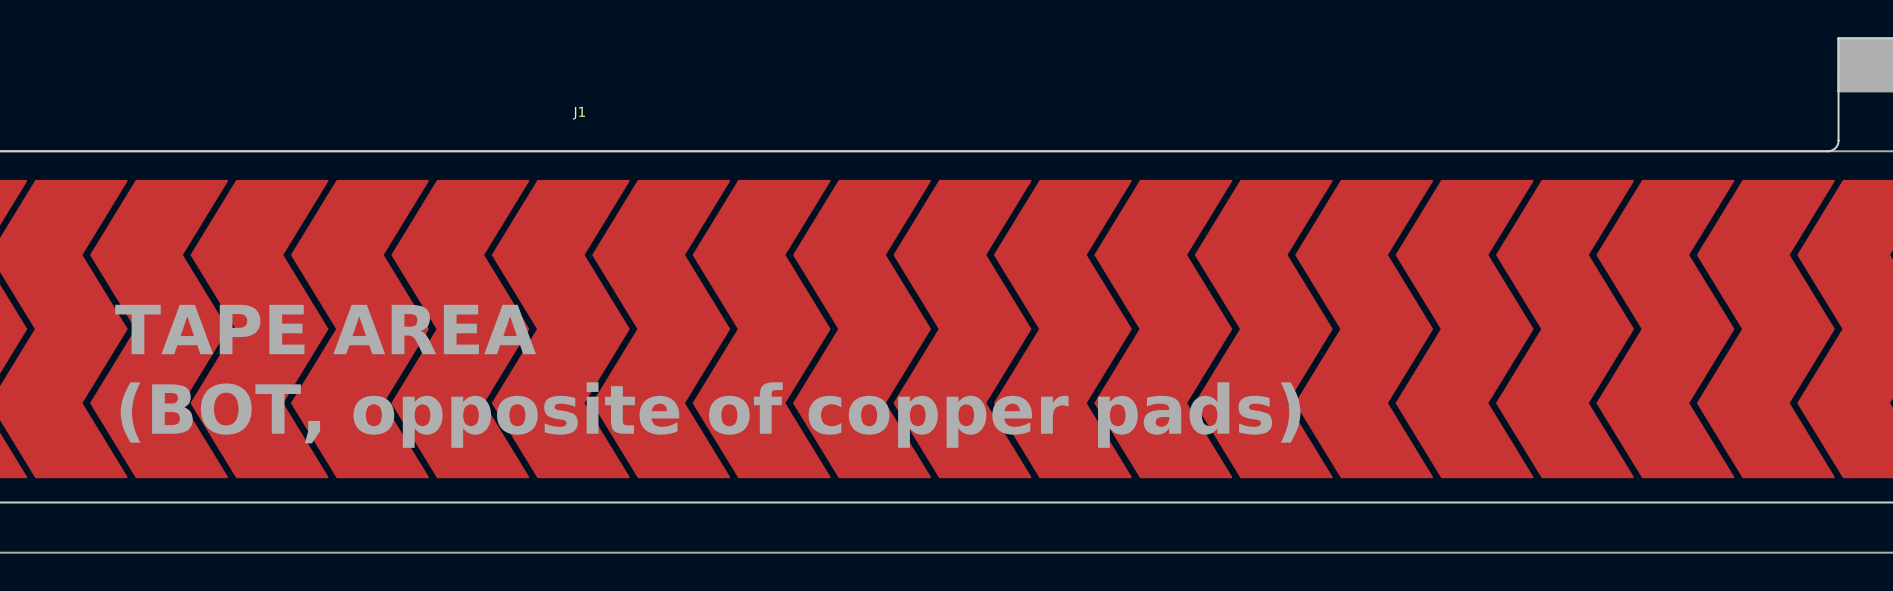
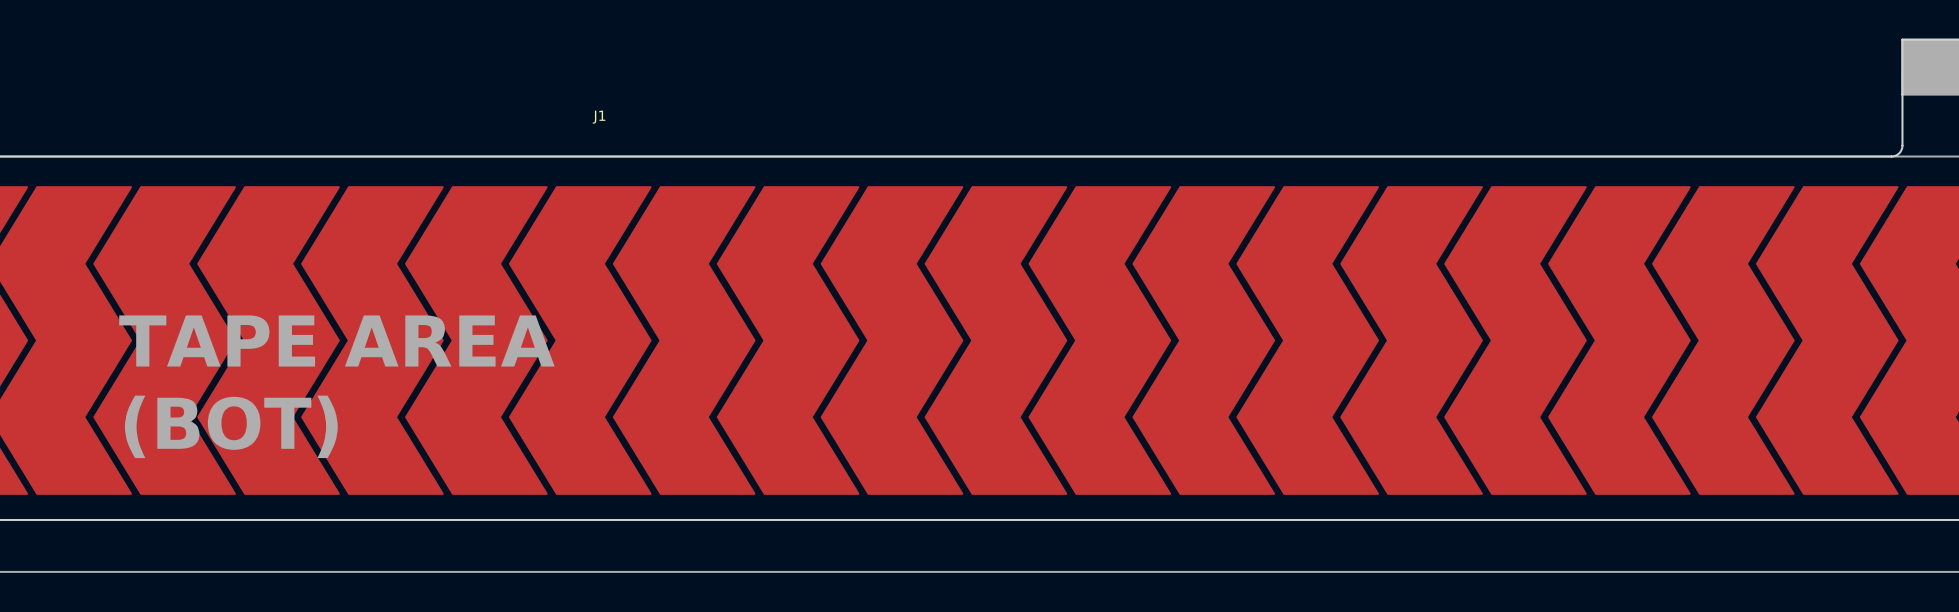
text: (BOT, opposite of copper pads) (710, 415) -> (BOT) (231, 426)

